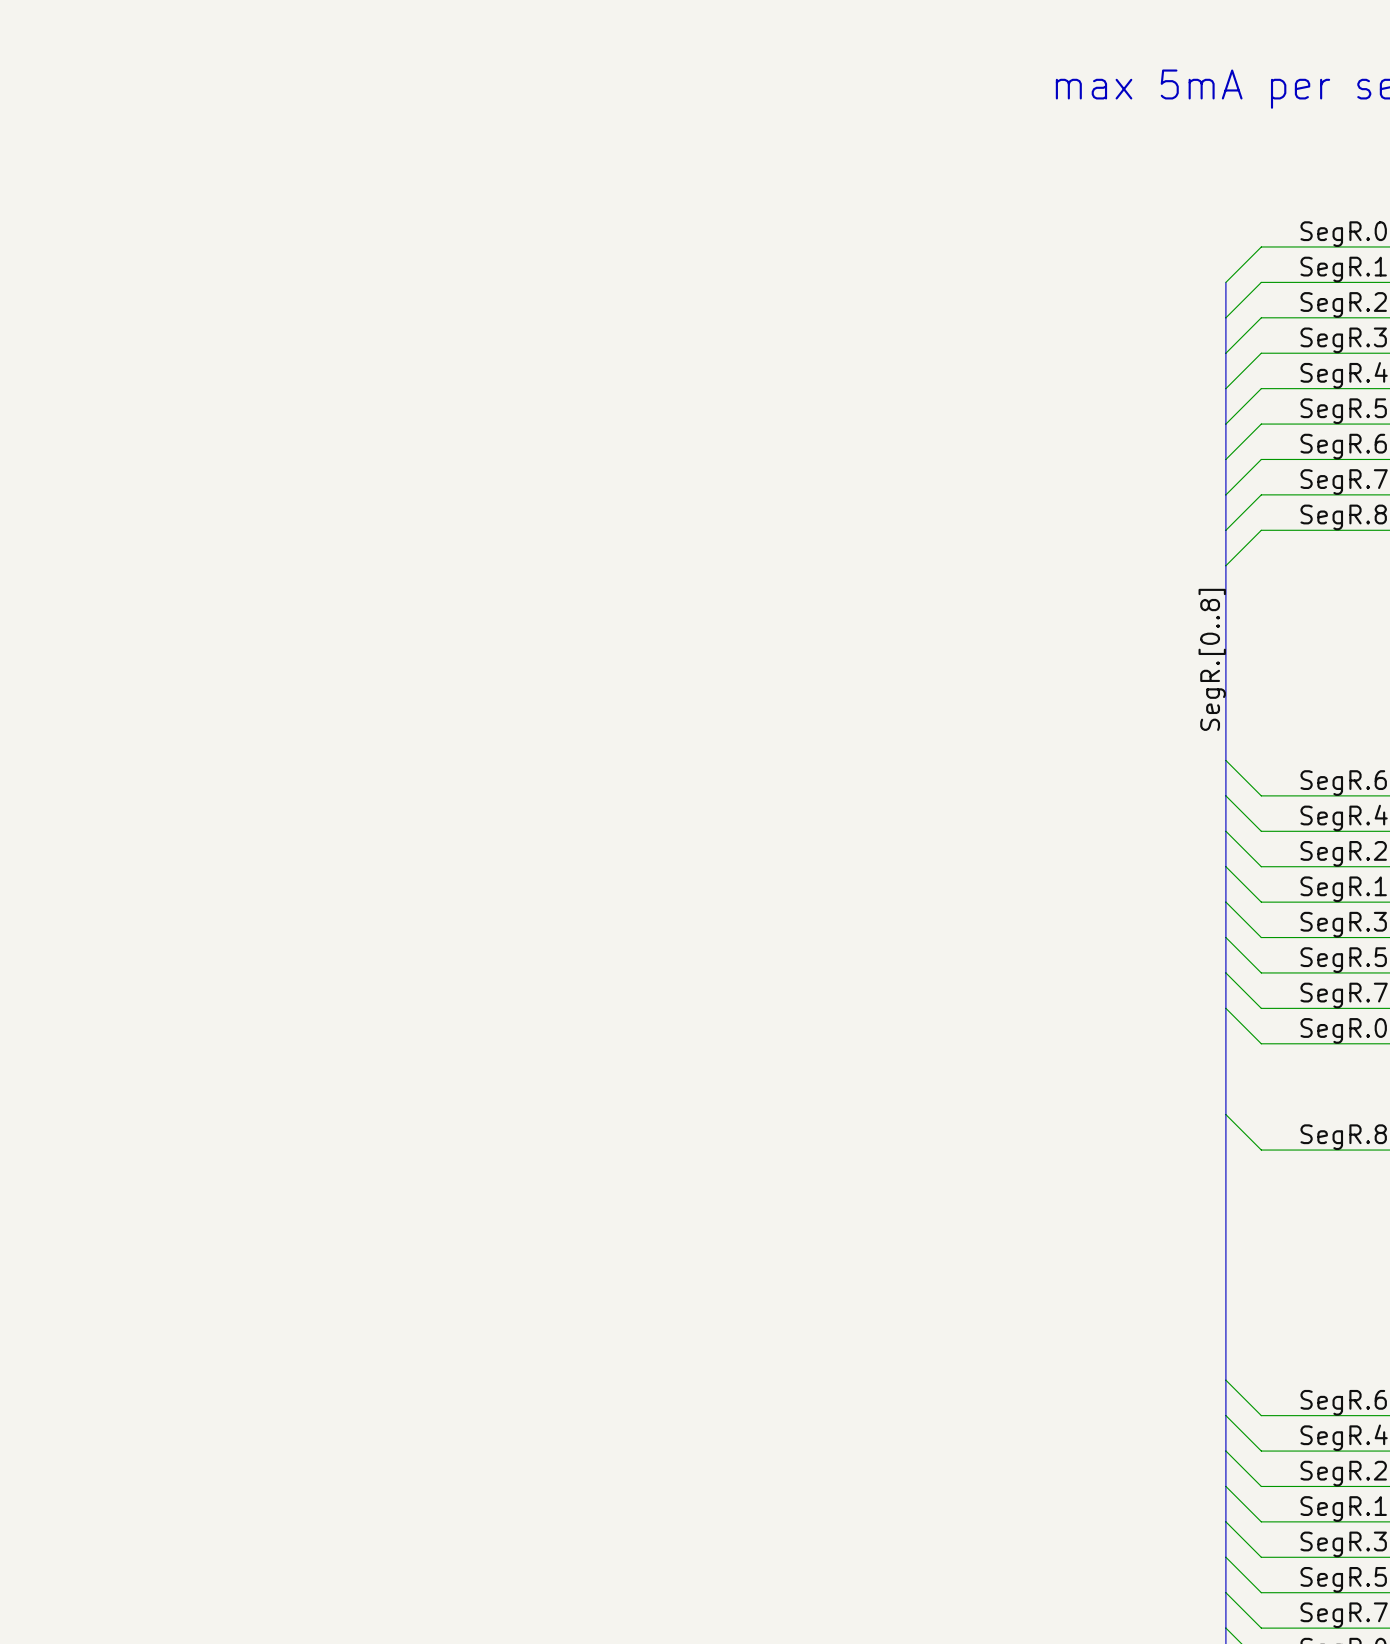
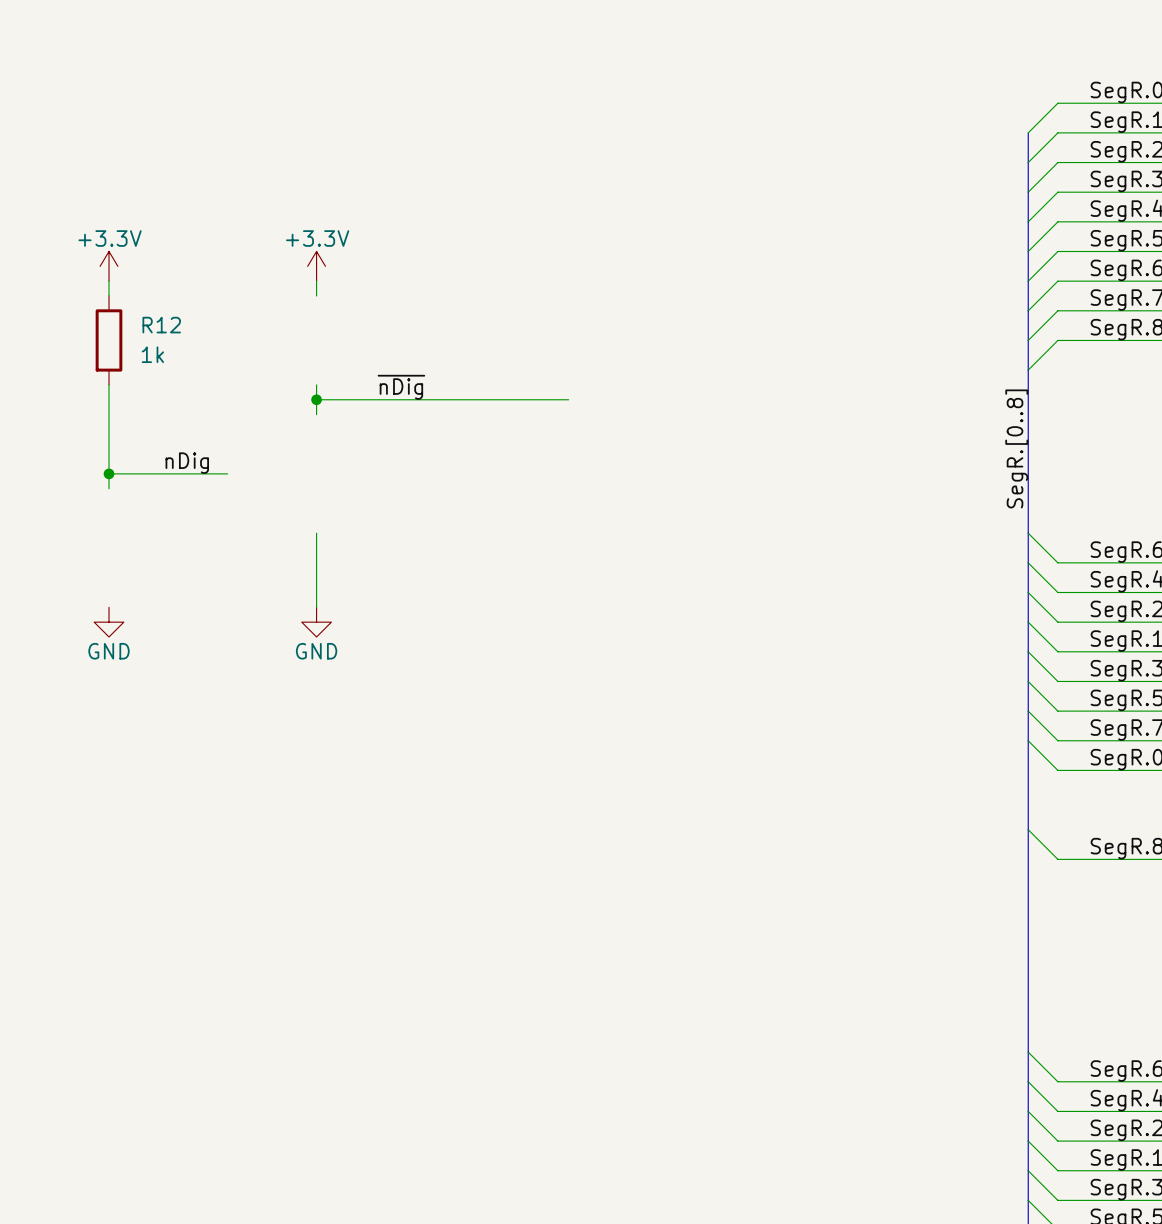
power symbol: none -> +3.3V (109, 266)
power symbol: none -> +3.3V (316, 266)
wire: none -> (109, 281) (109, 295)
wire: none -> (316, 281) (316, 295)
R12: none -> 1k (109, 340)
wire: none -> (109, 384) (109, 488)
wire: none -> (316, 384) (316, 414)
label: none -> ~{nDig} (401, 387)
wire: none -> (316, 399) (568, 399)
junction: none -> (316, 399)
label: none -> nDig (187, 463)
wire: none -> (109, 473) (227, 473)
junction: none -> (109, 473)
wire: none -> (316, 533) (316, 607)
power symbol: none -> GND (109, 622)
power symbol: none -> GND (316, 622)

